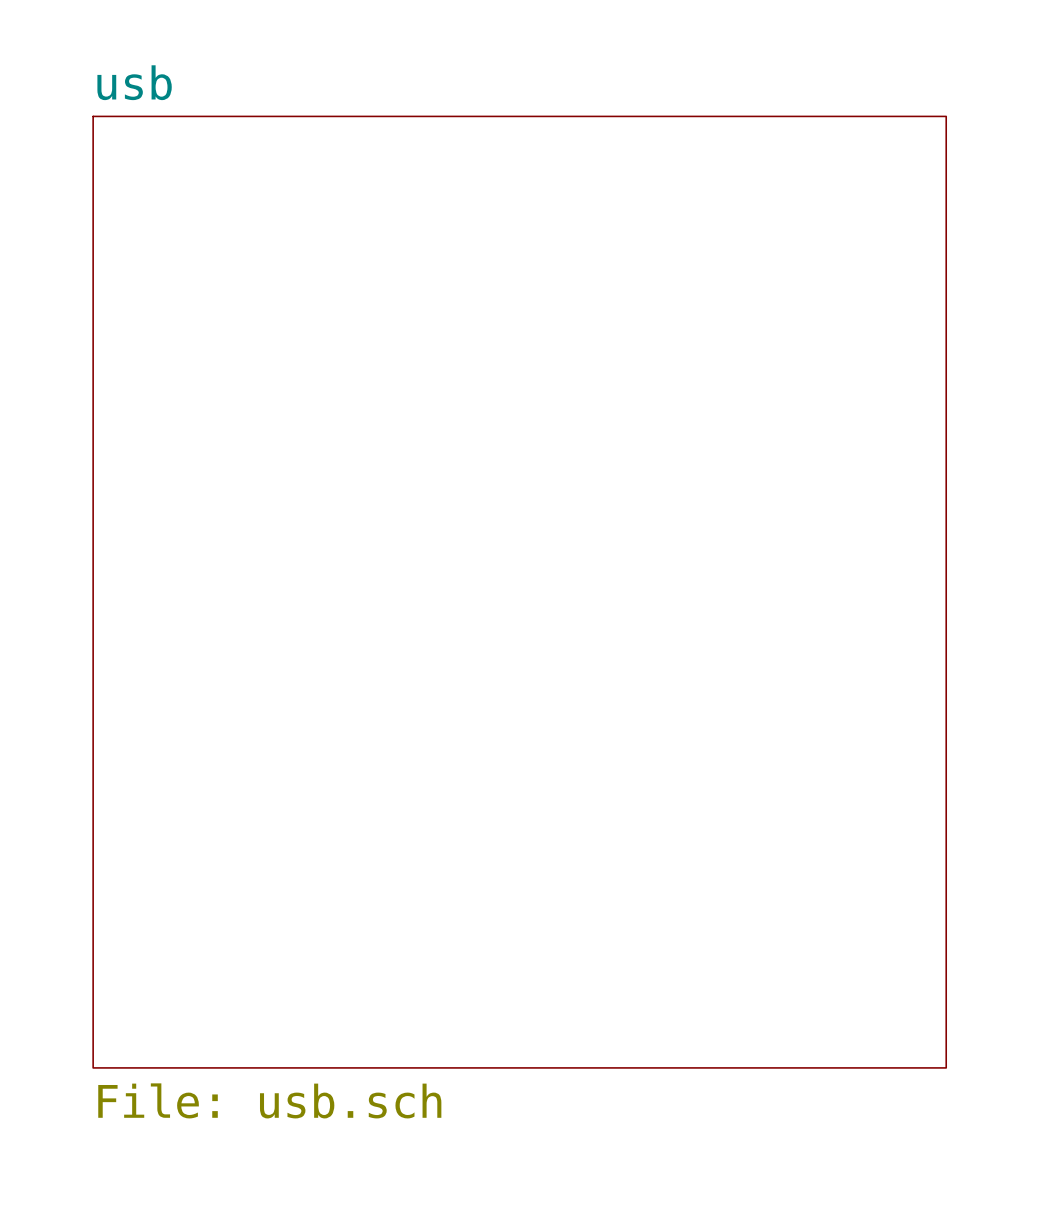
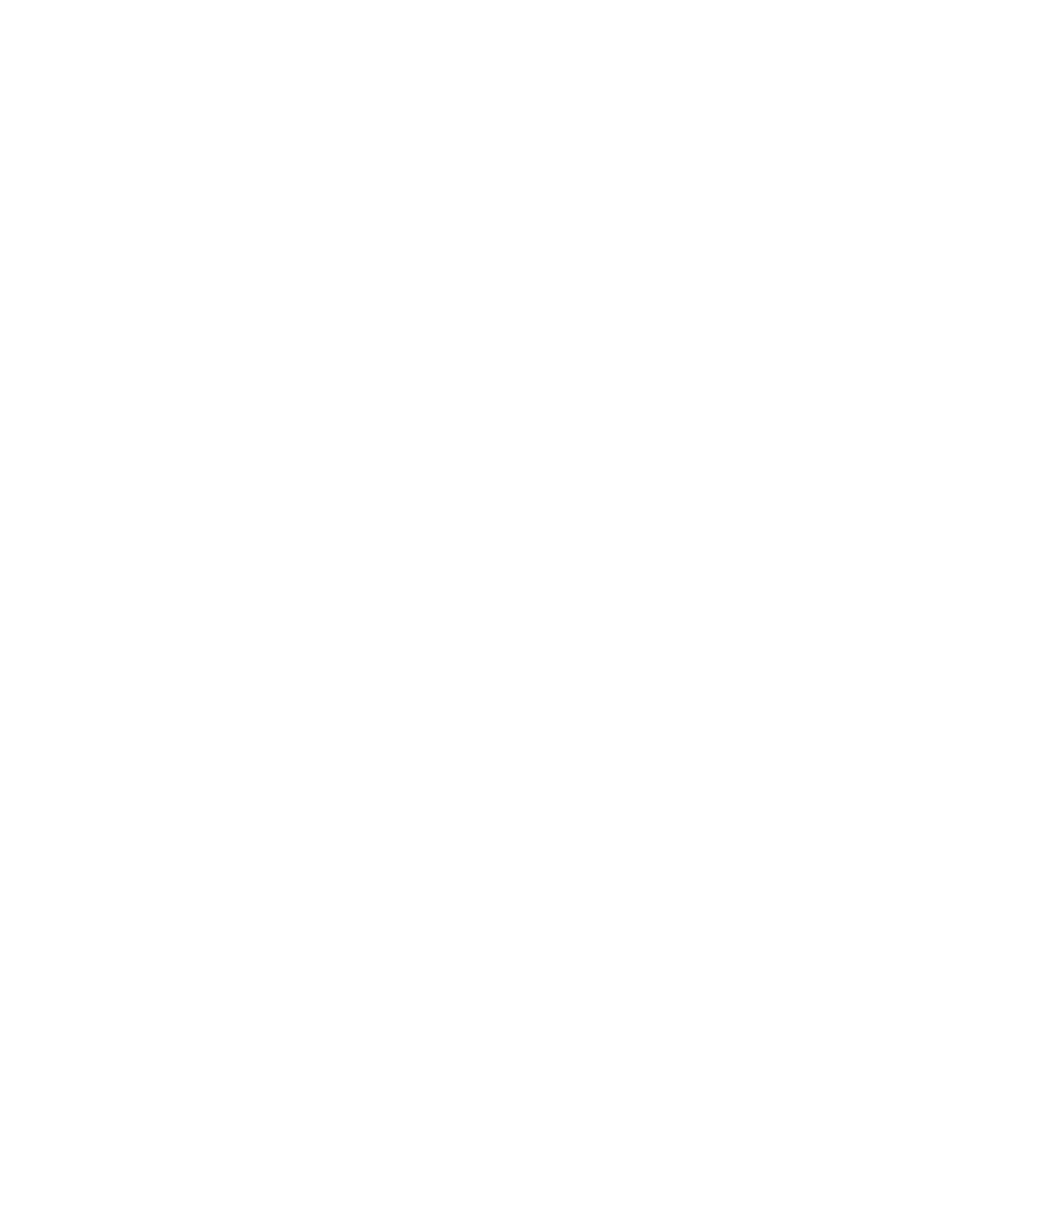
sheet usb: File: usb.sch (519, 592) -> none

